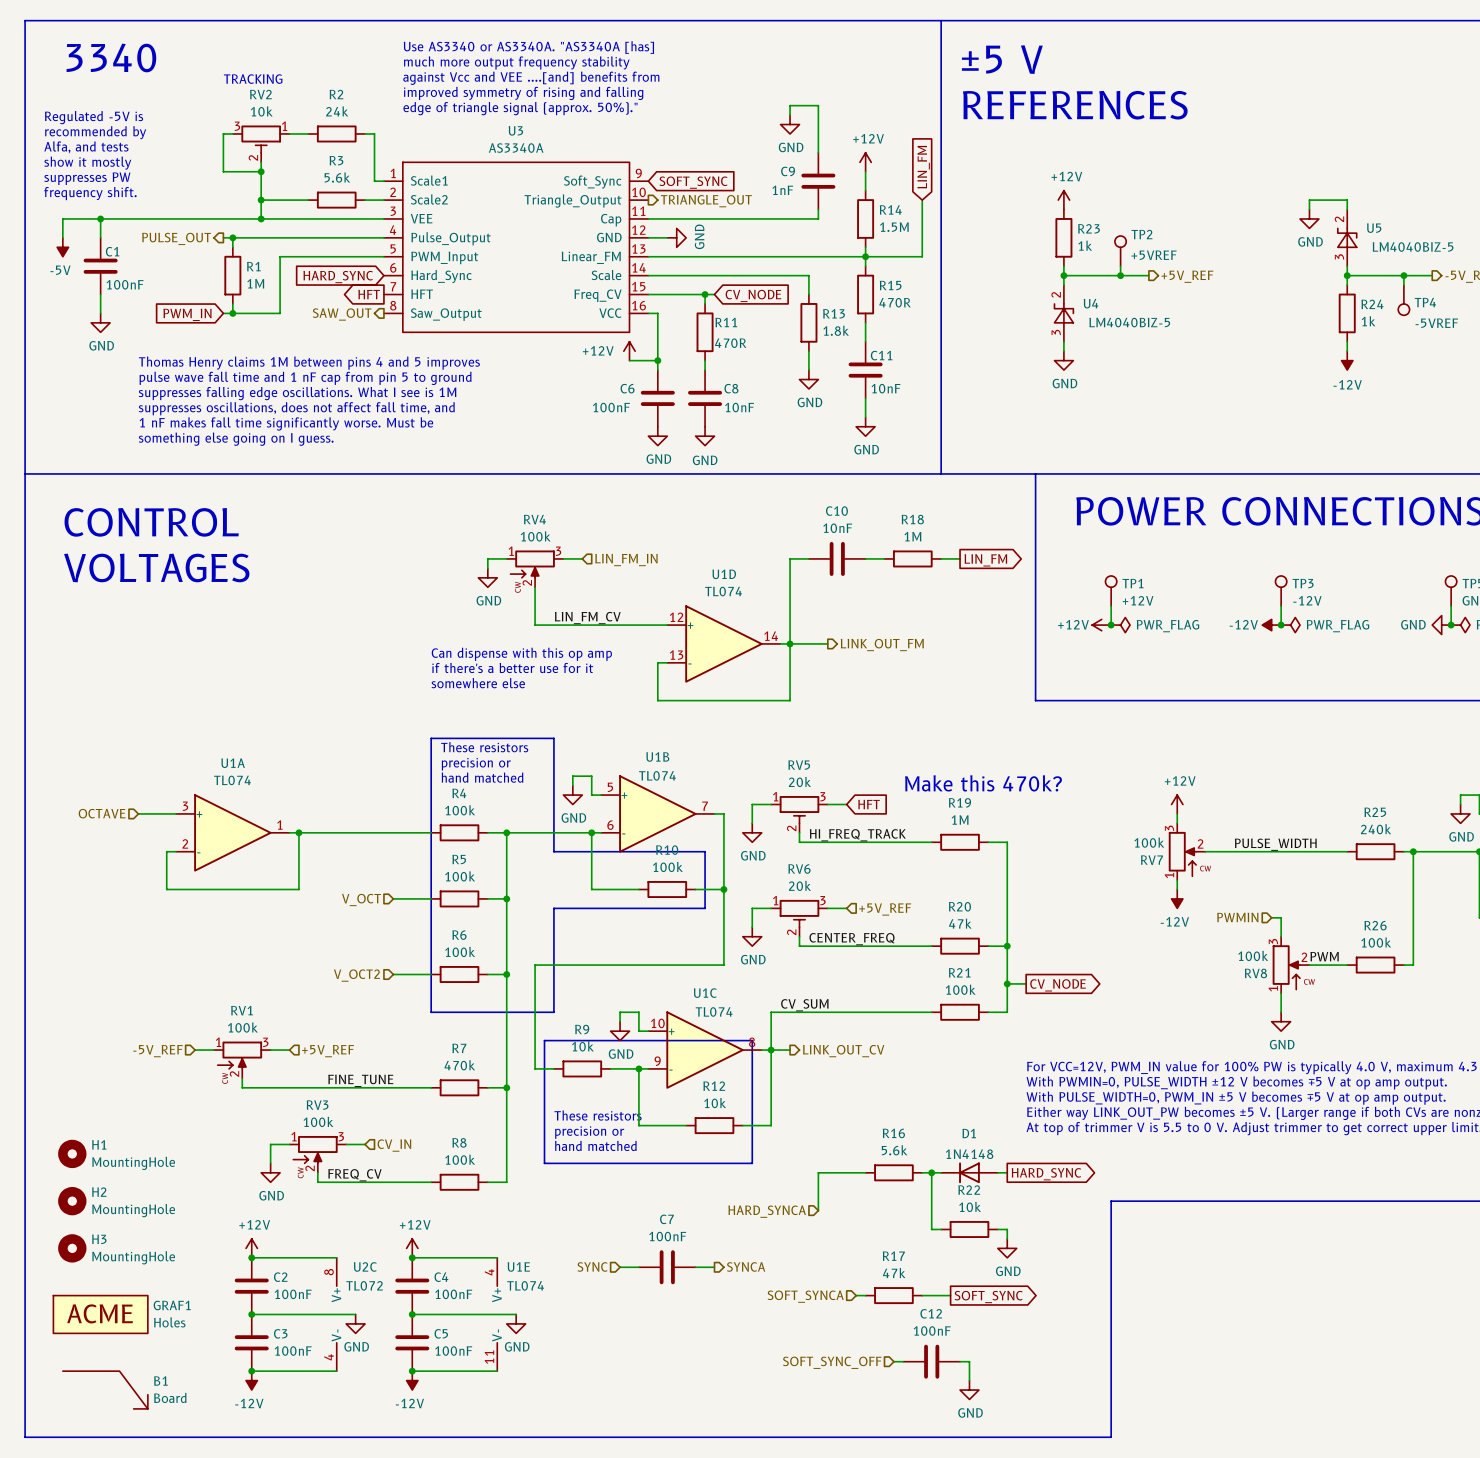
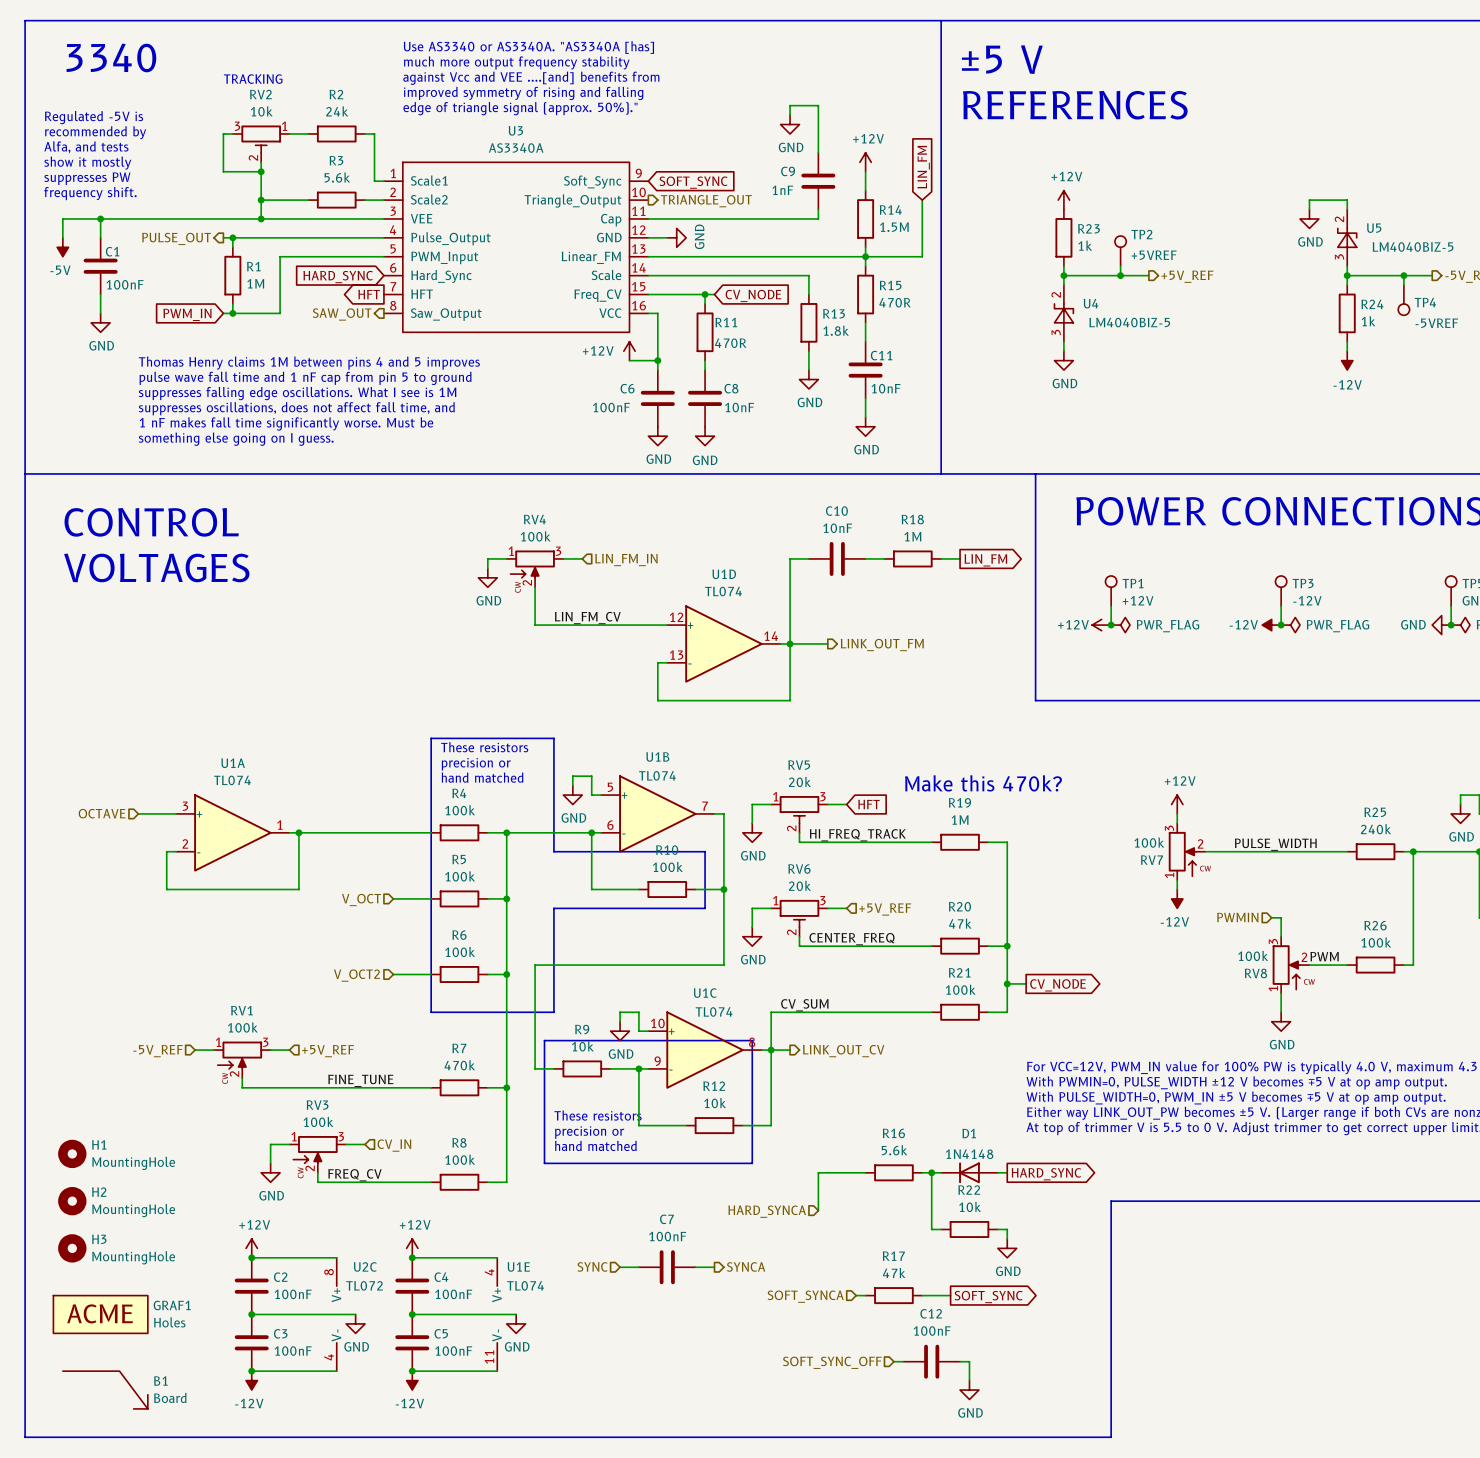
text: Can dispense with this op amp (521, 654) -> none
text: if there's a better use for it (512, 667) -> none
text: somewhere else (478, 683) -> none

